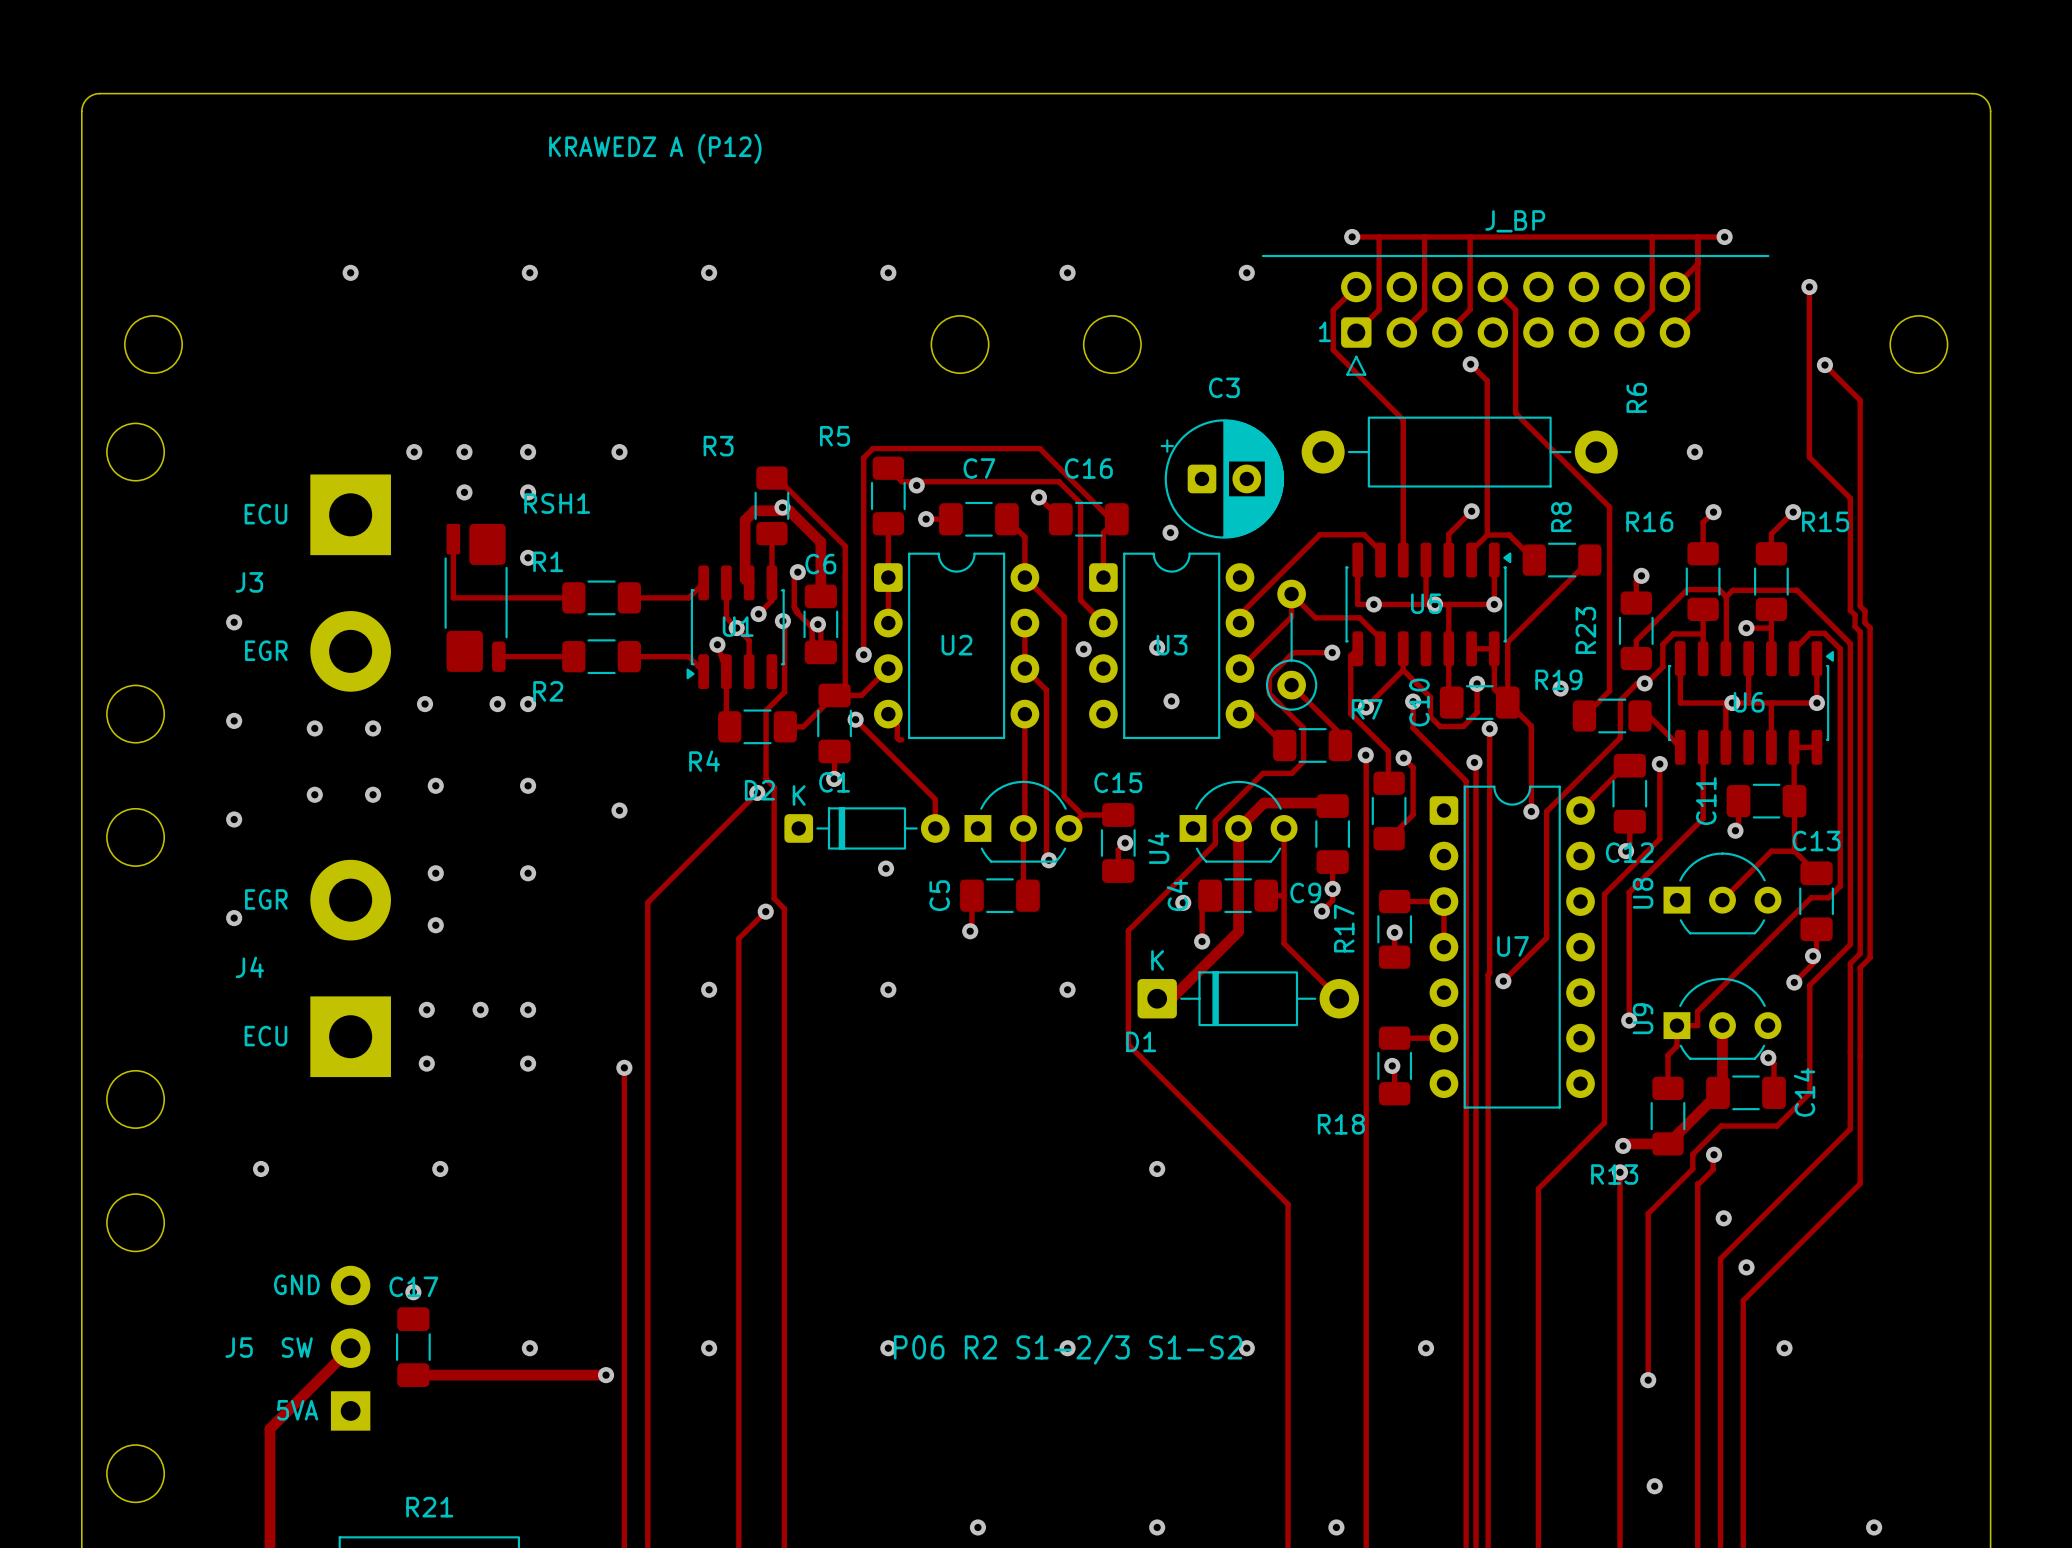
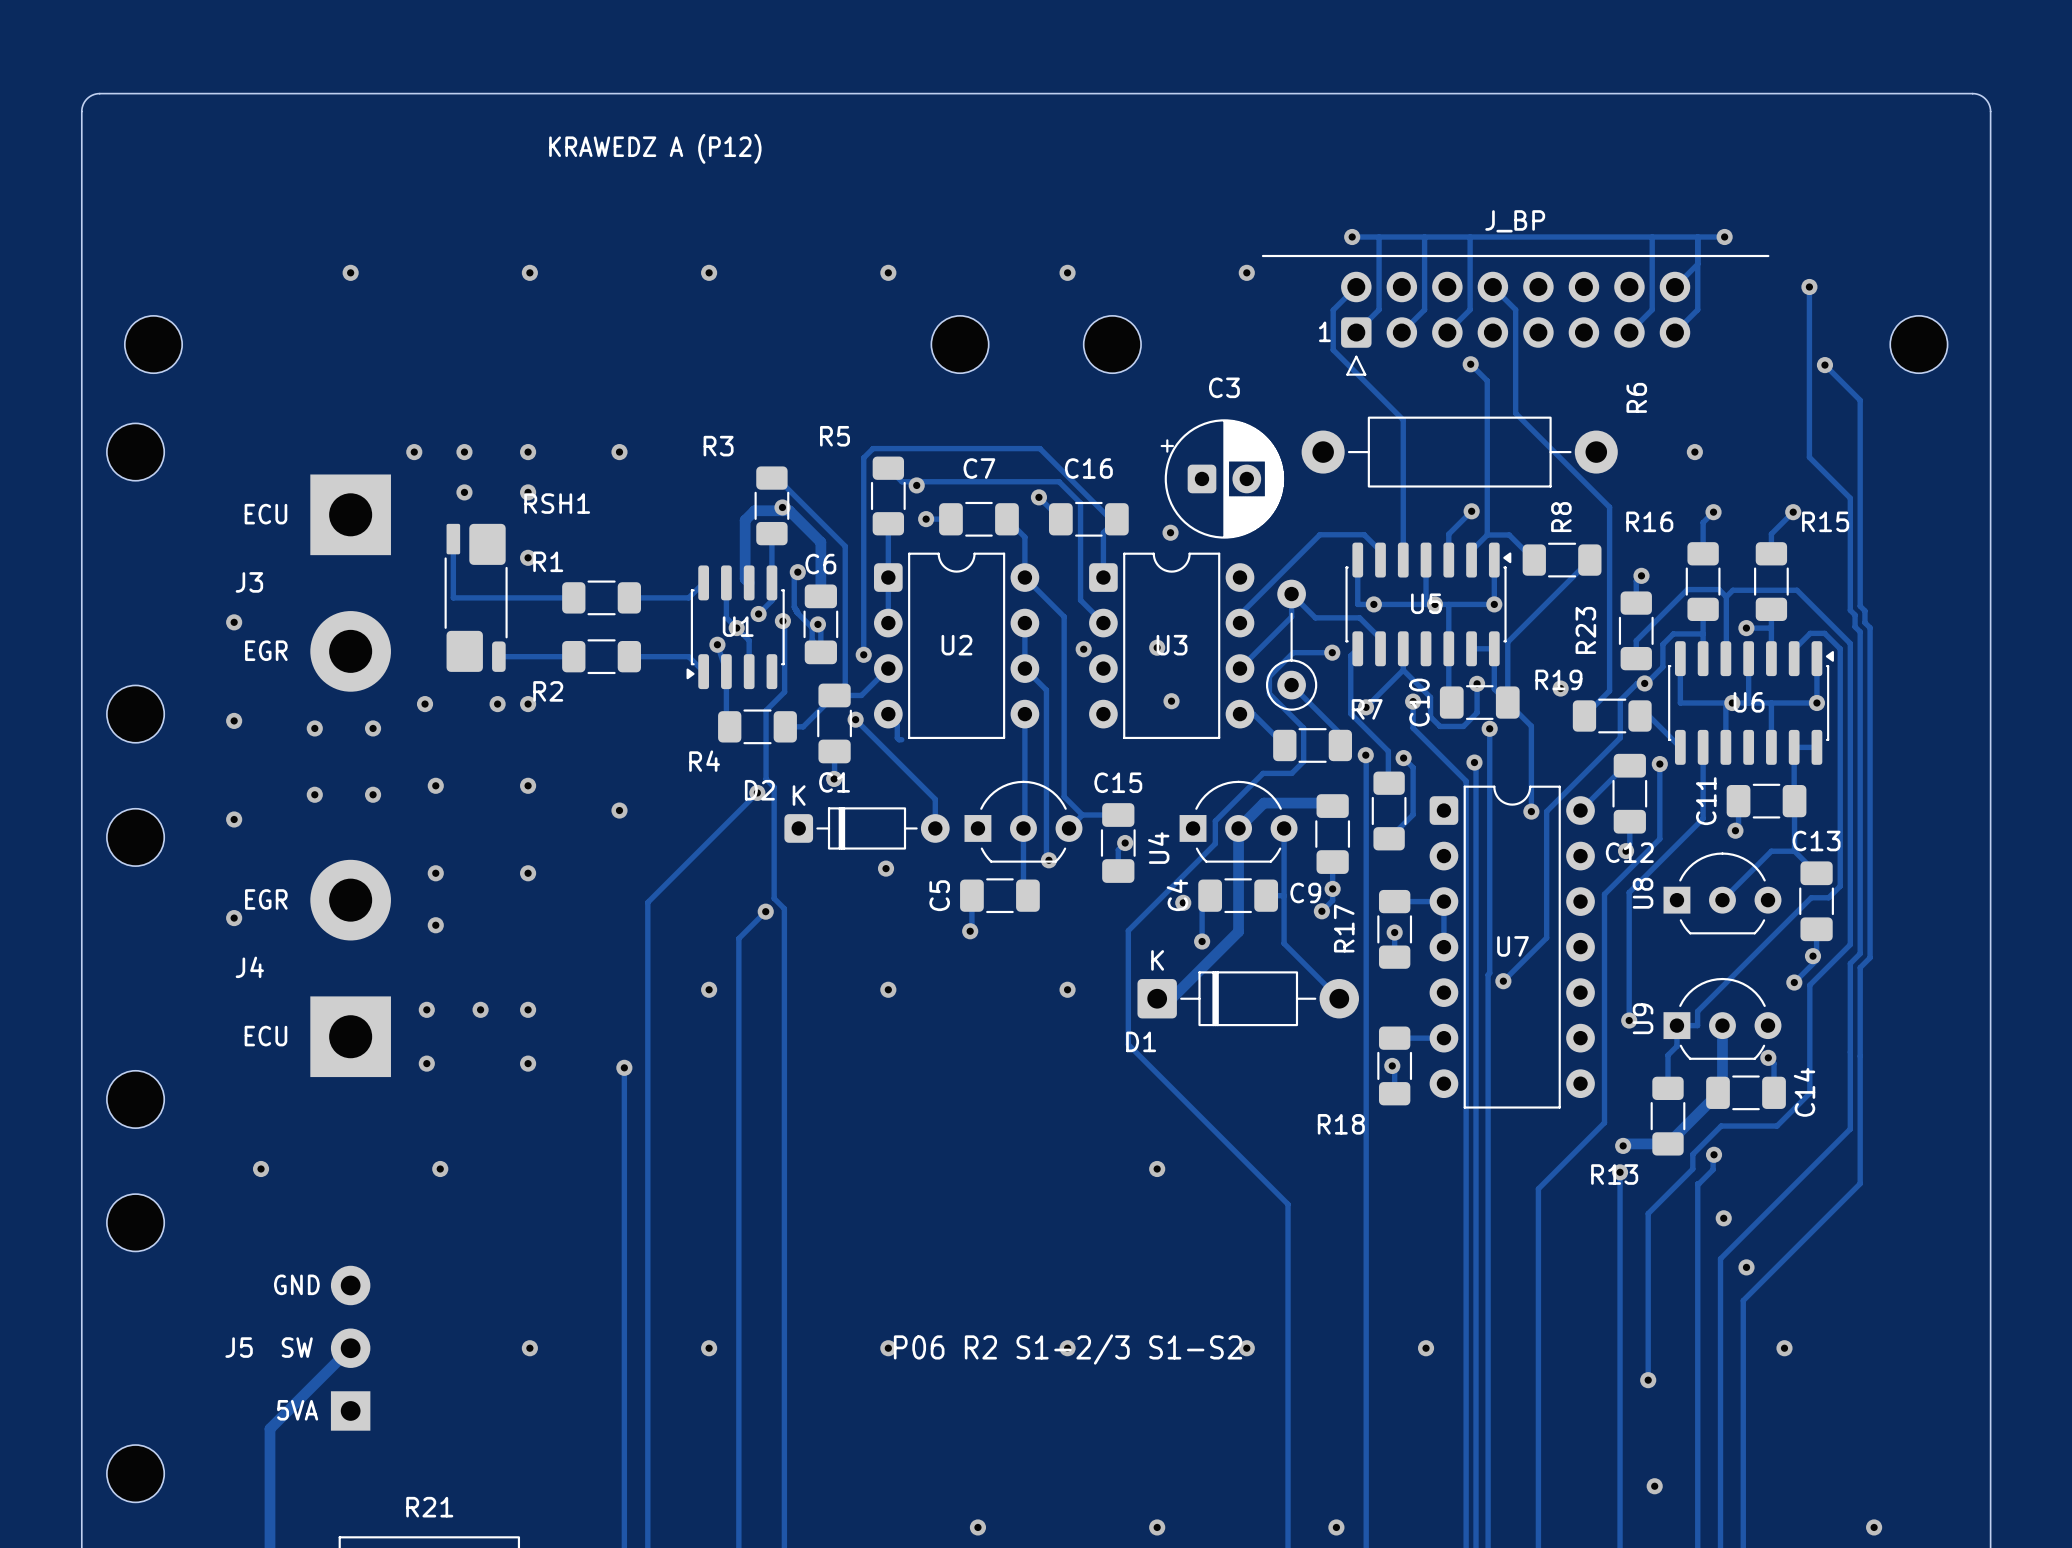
via: (413, 1292) -> none
C17: (413, 1347) -> none
track: (413, 1375) (606, 1375) -> none
via: (606, 1375) -> none

